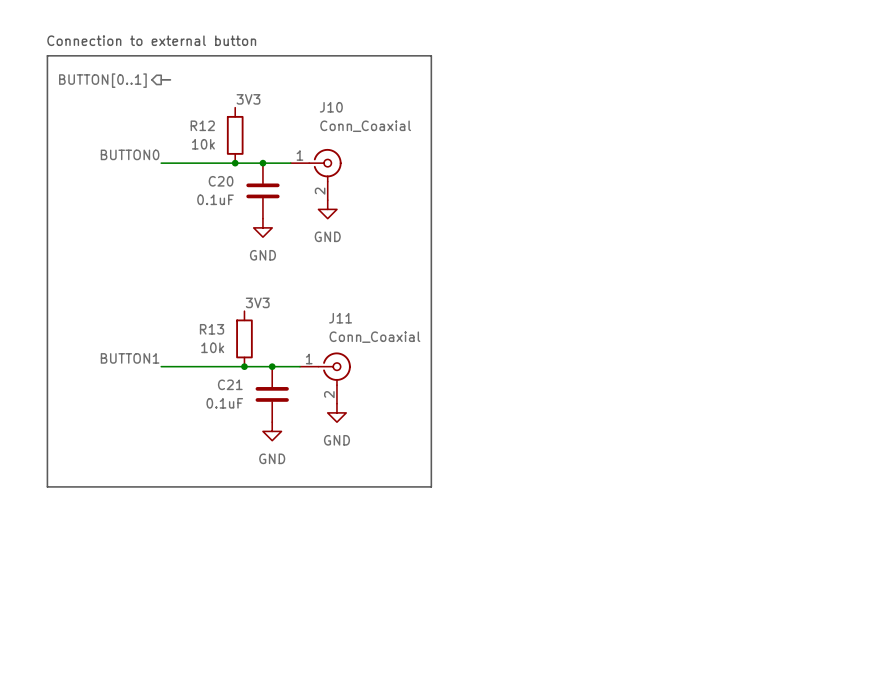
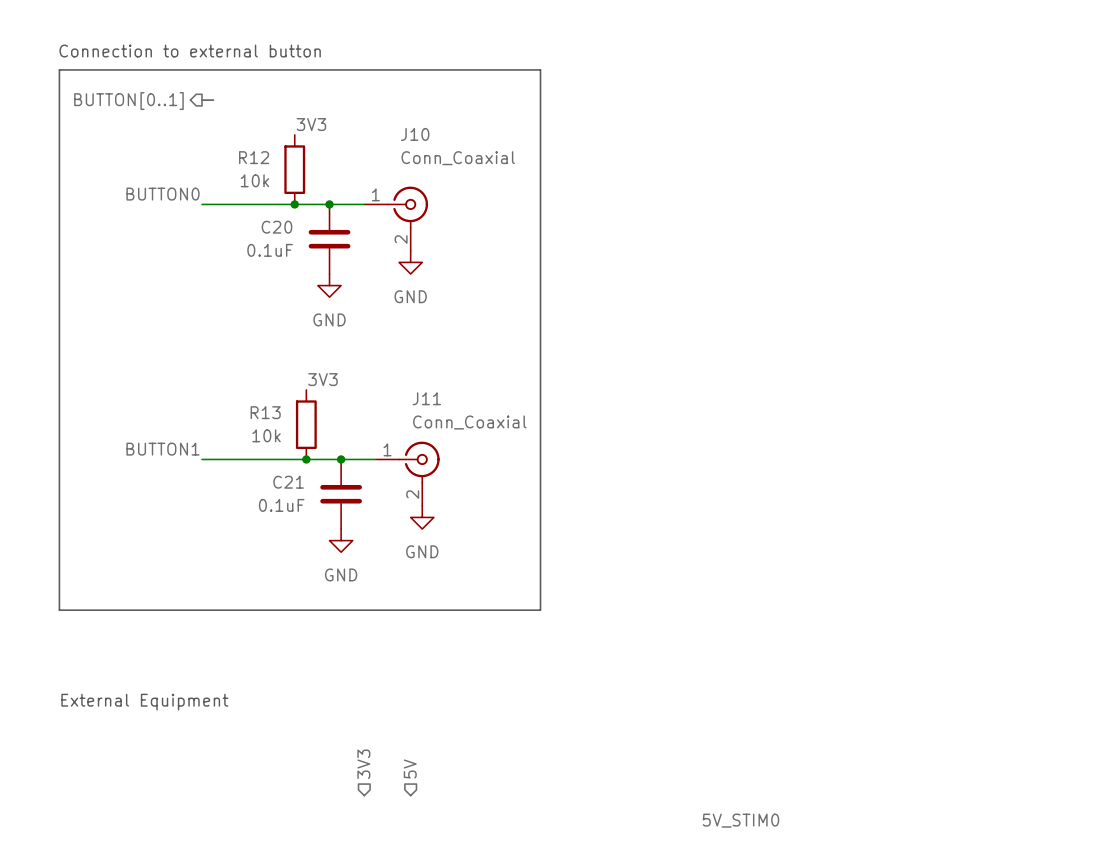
text: none -> External Equipment (144, 702)
hierarchical label: none -> 3V3 (363, 764)
hierarchical label: none -> 5V (410, 768)
label: none -> 5V_STIM0 (740, 820)

